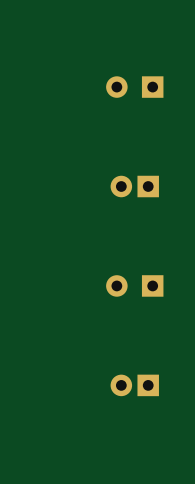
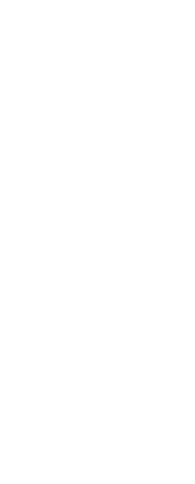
part: (134, 87) -> none
part: (134, 186) -> none
part: (134, 285) -> none
part: (134, 385) -> none

